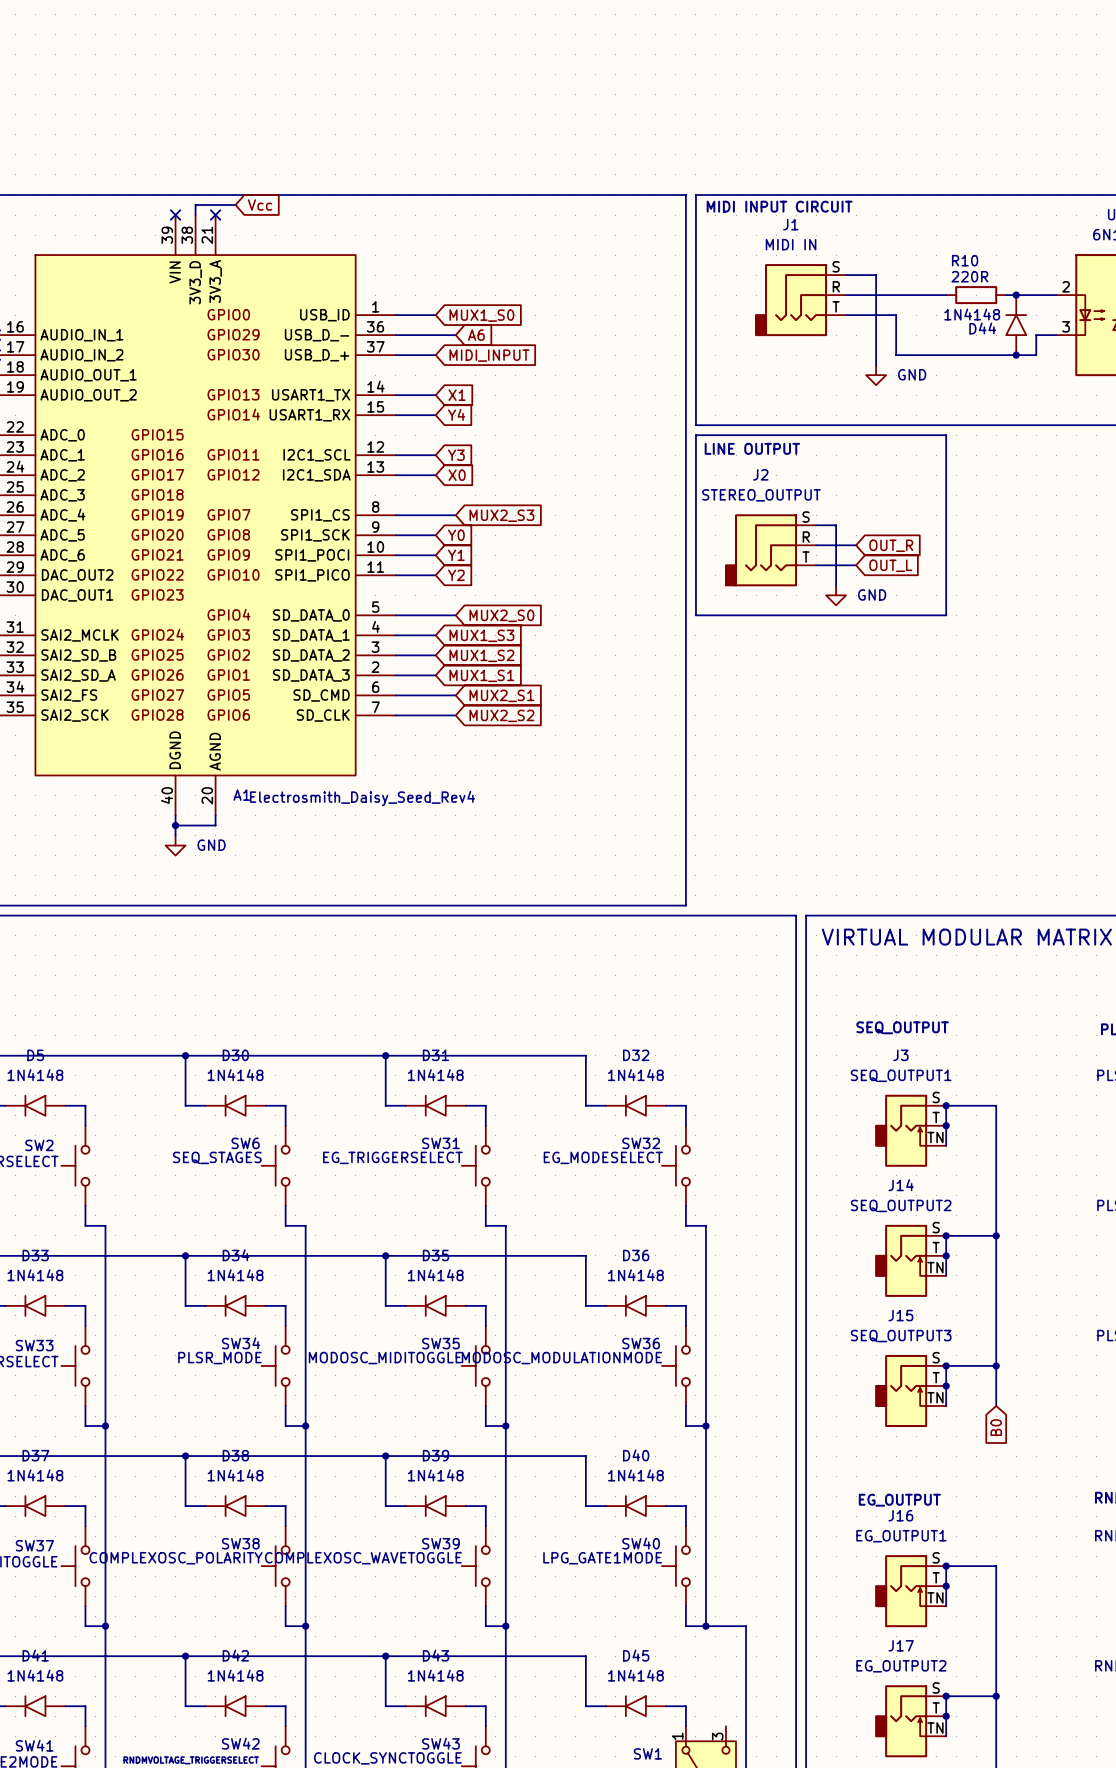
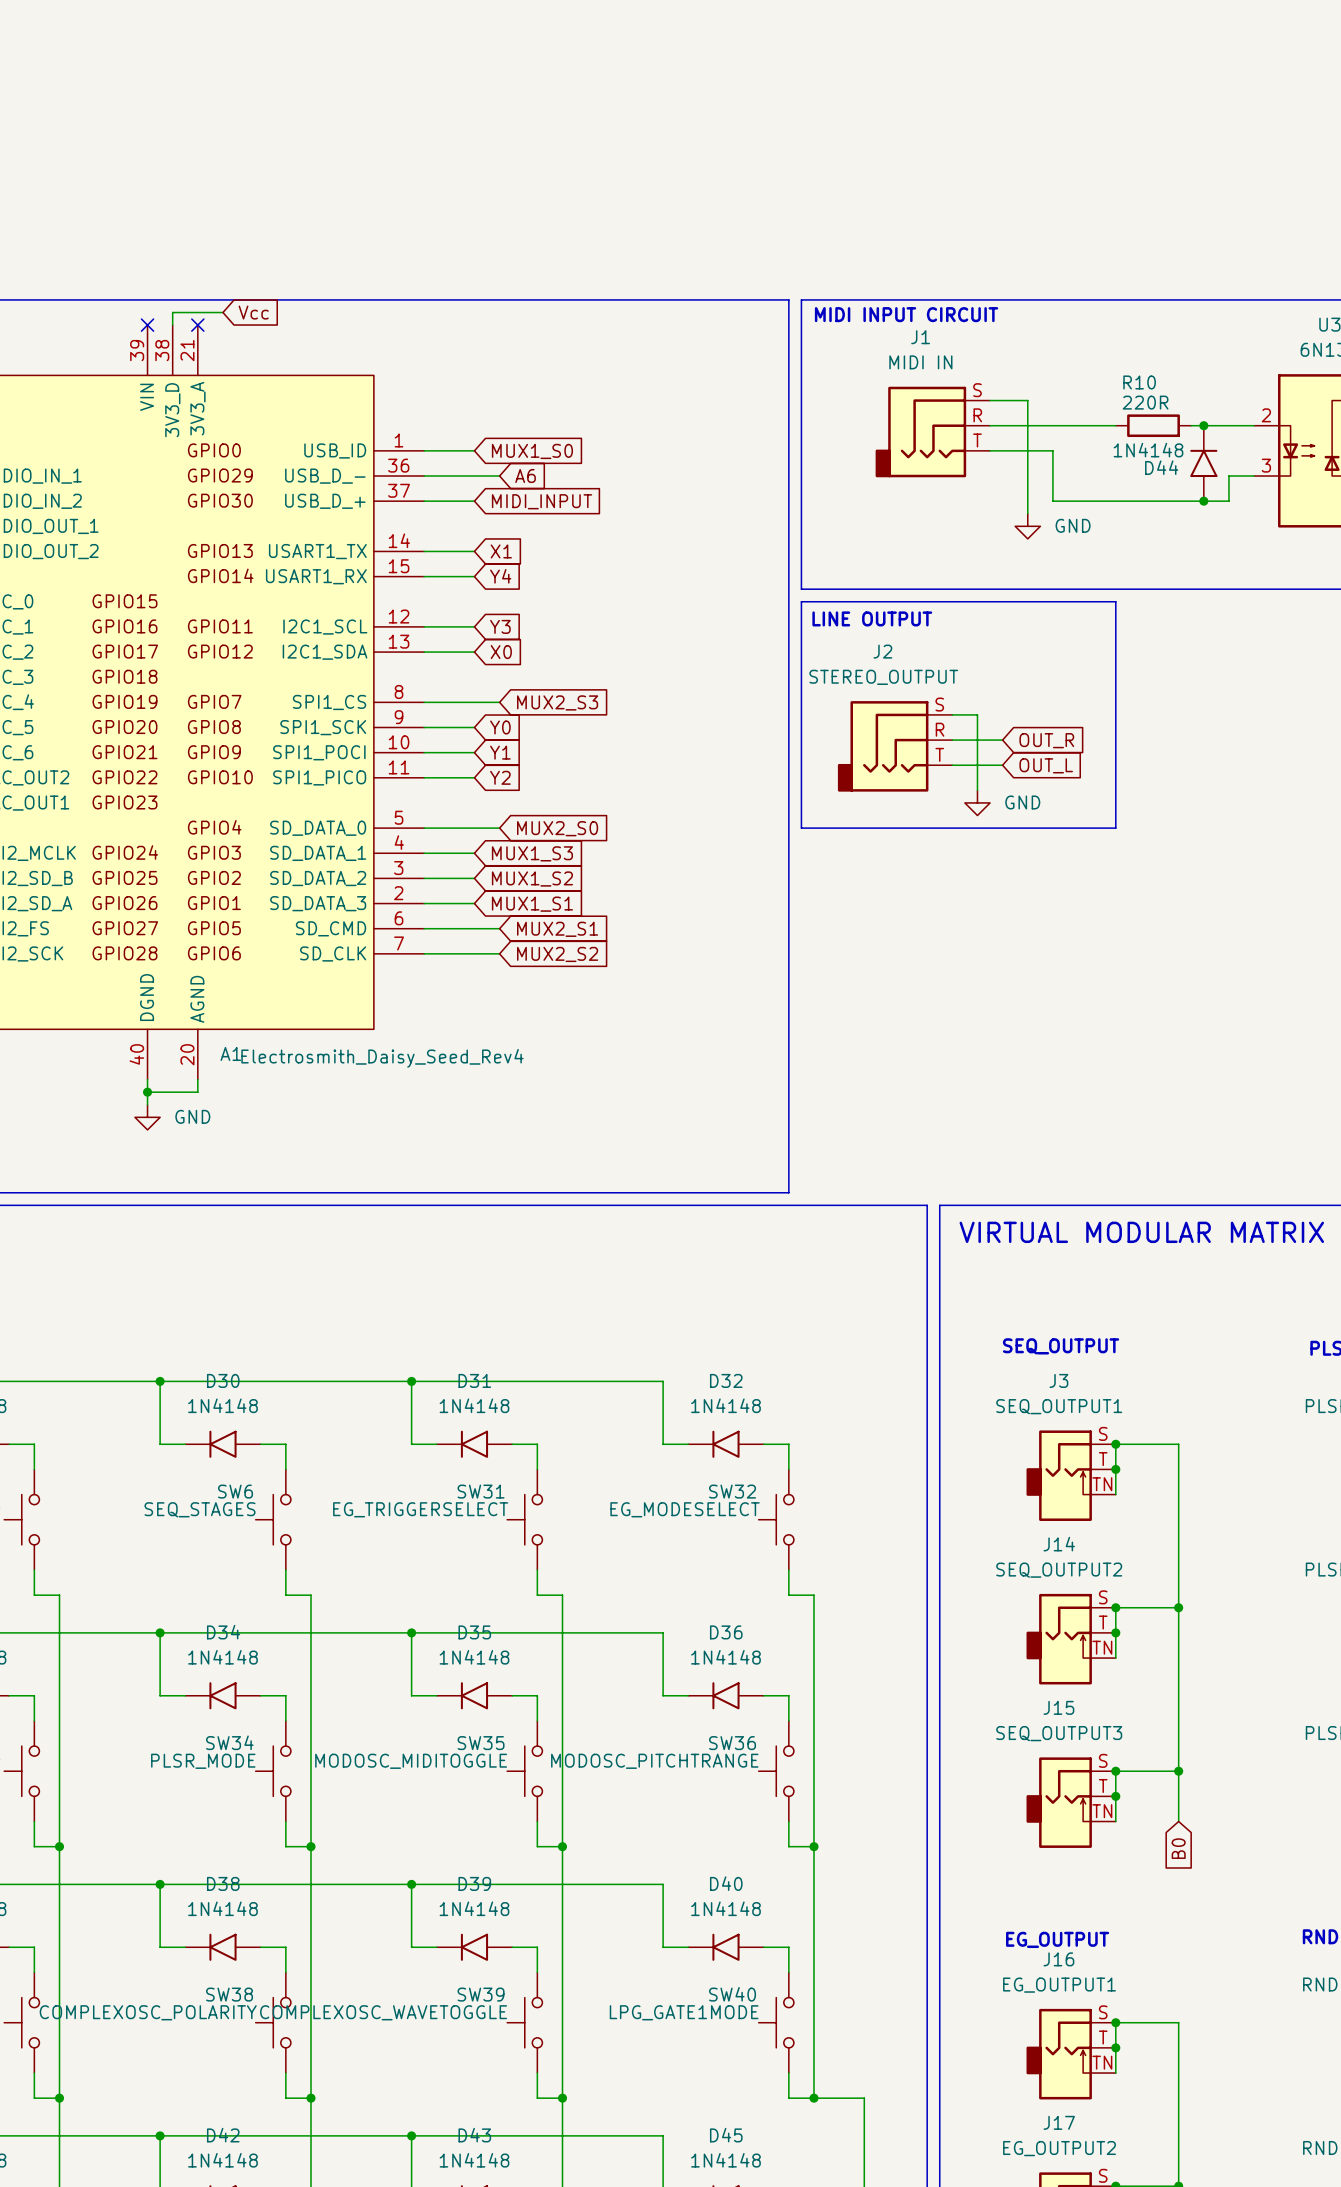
SW36 value: MODOSC_MODULATIONMODE (561, 1358) -> MODOSC_PITCHTRANGE (654, 1761)

